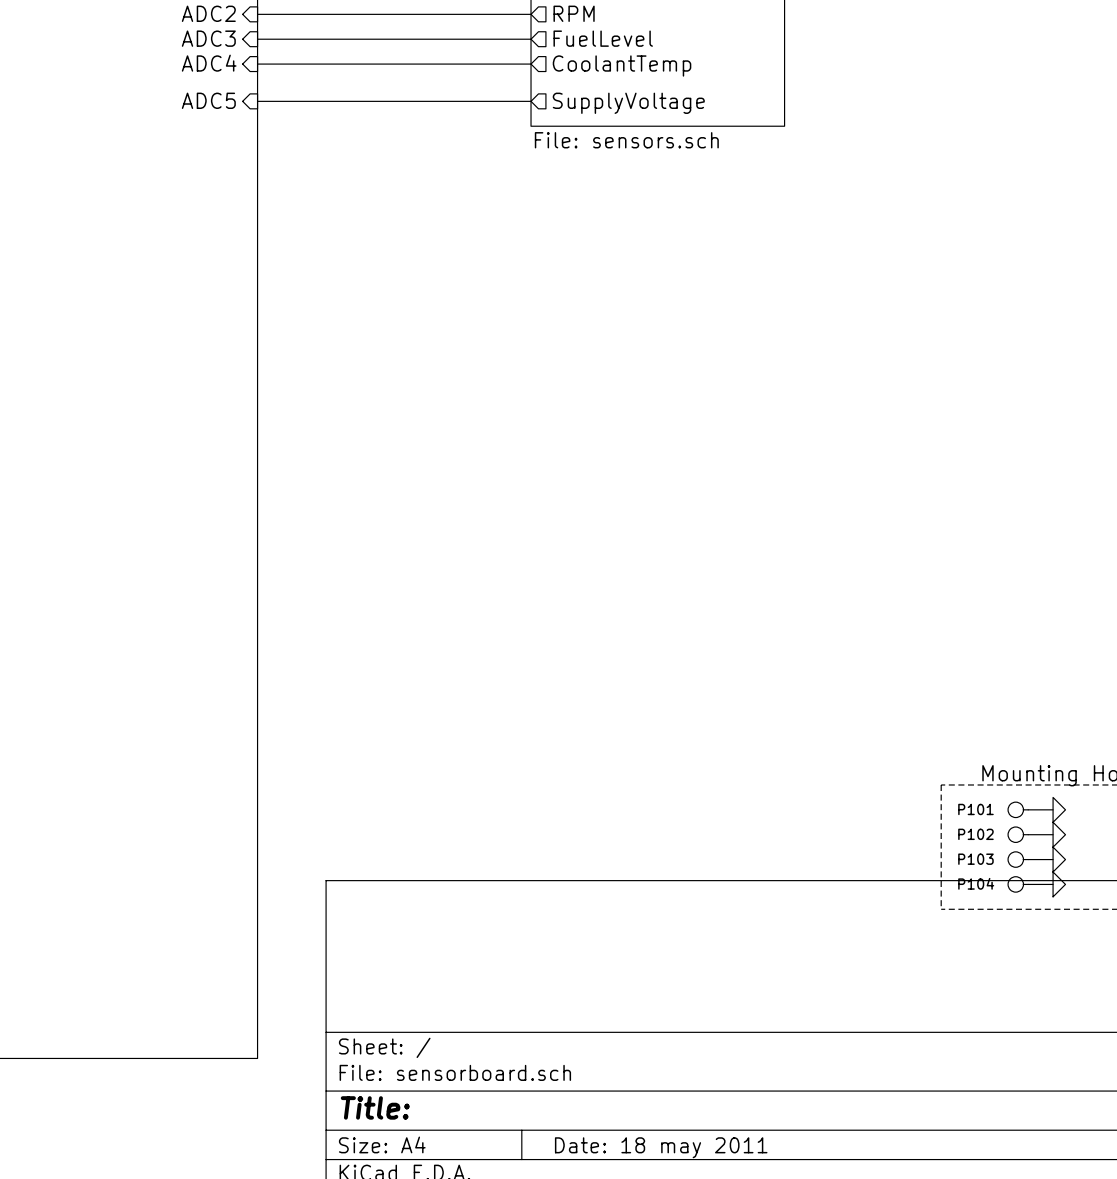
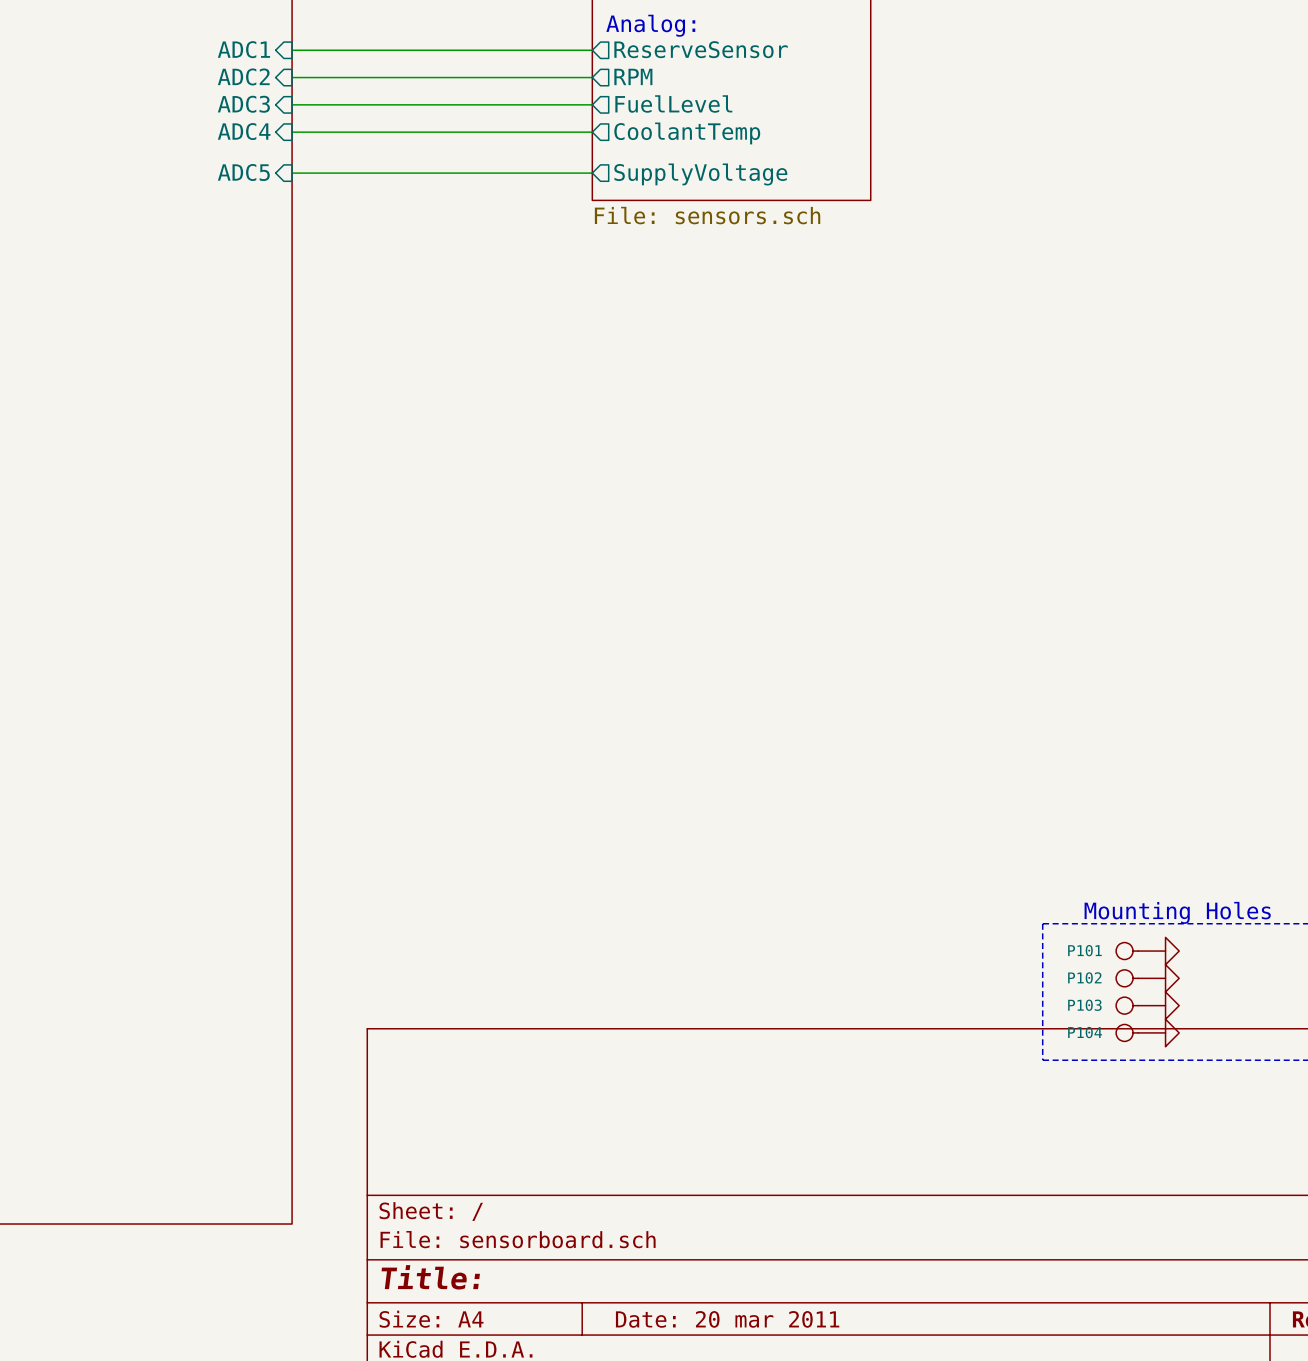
title block: Date: 18 may 2011 (661, 1147) -> Date: 20 mar 2011 (727, 1319)

